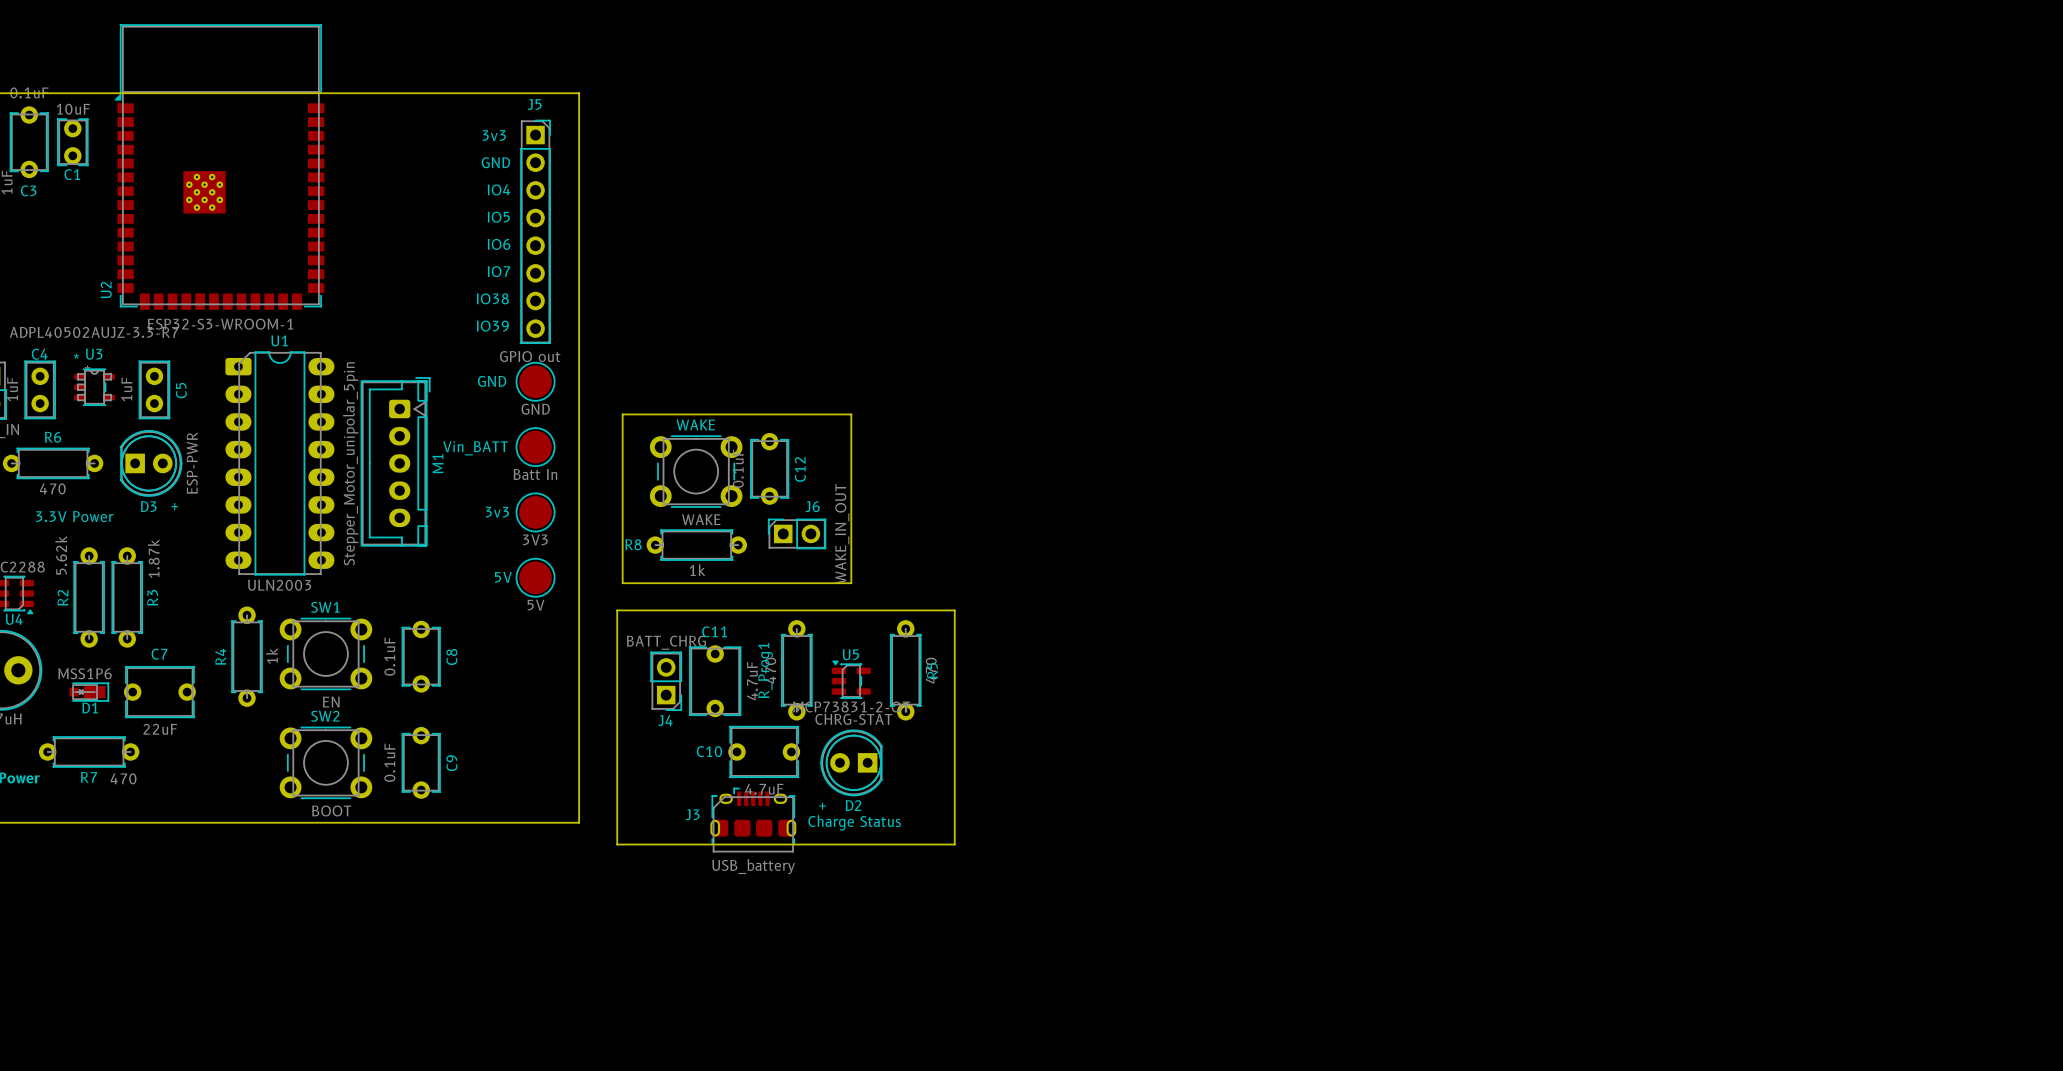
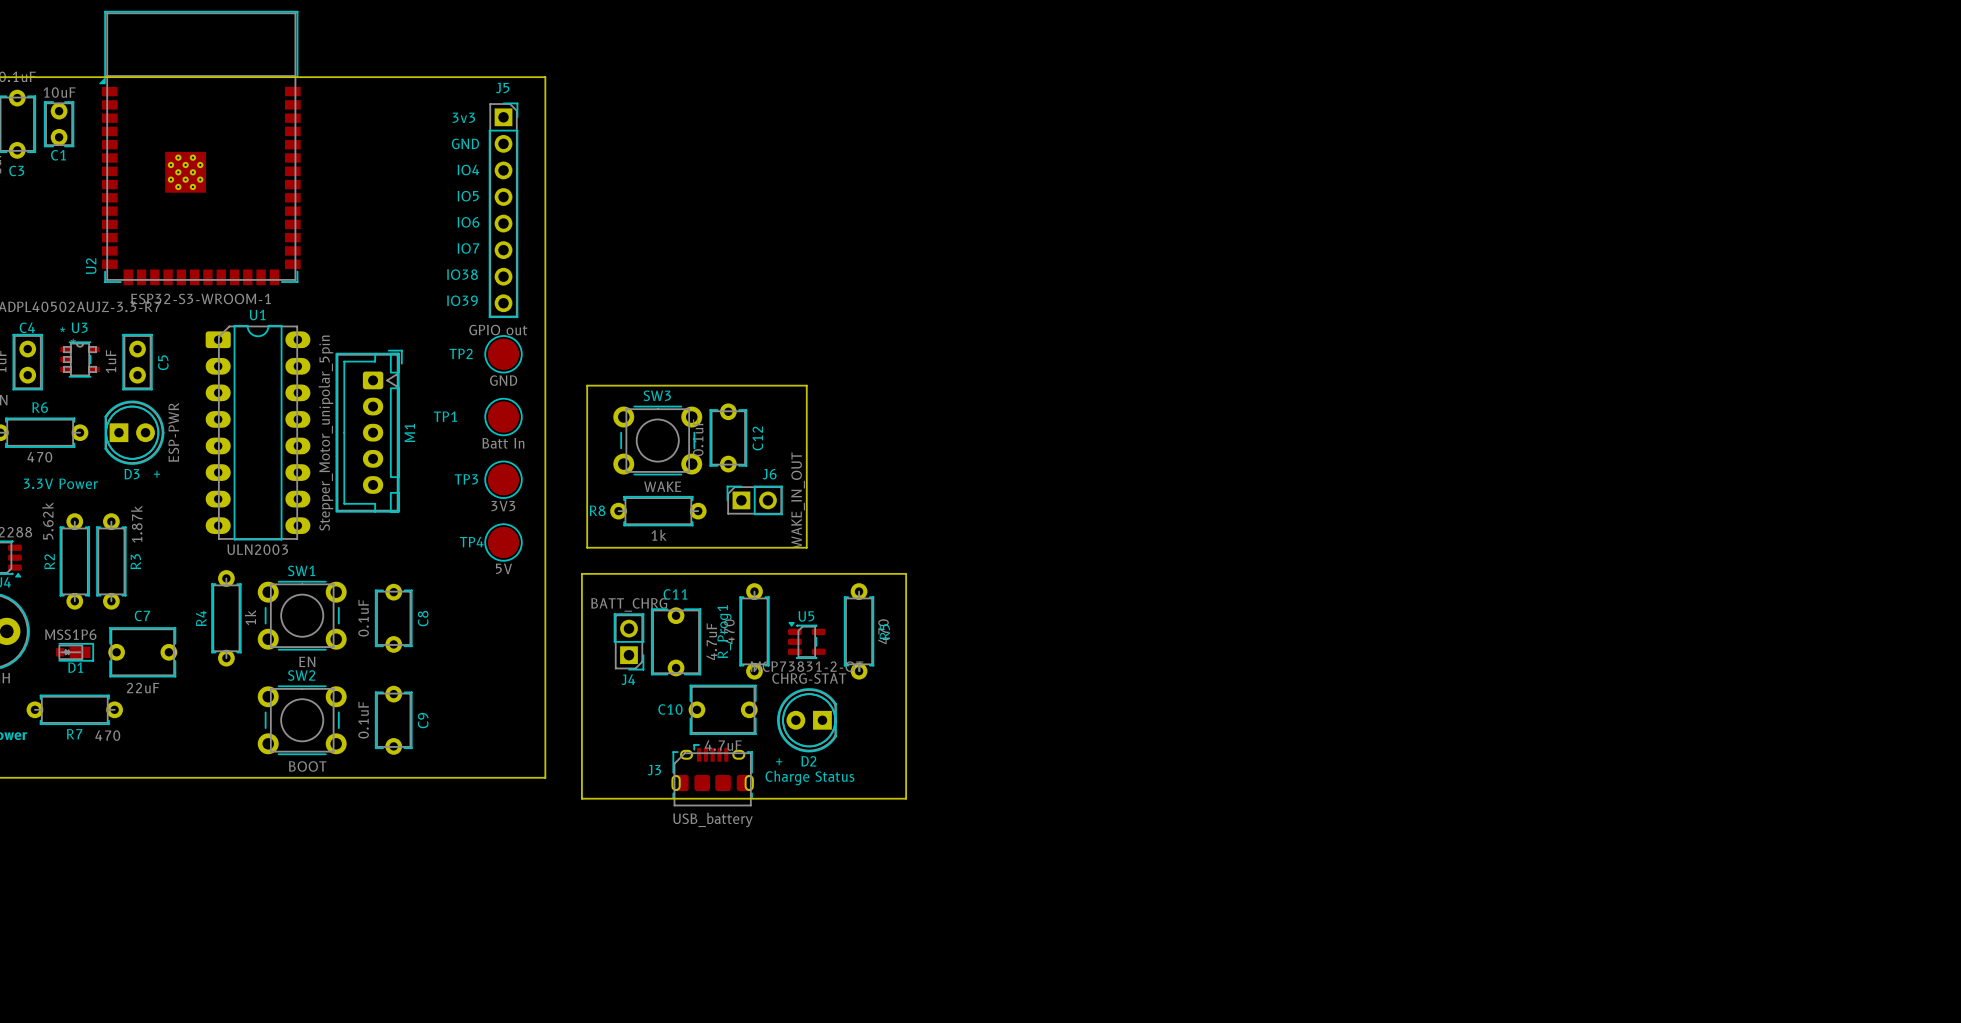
GND name: GND (492, 381) -> TP2 (461, 353)
WAKE name: WAKE (695, 424) -> SW3 (657, 395)
Vin_BATT name: Vin_BATT (475, 448) -> TP1 (445, 416)
3v3 name: 3v3 (497, 512) -> TP3 (466, 479)
5V name: 5V (503, 577) -> TP4 (471, 542)

